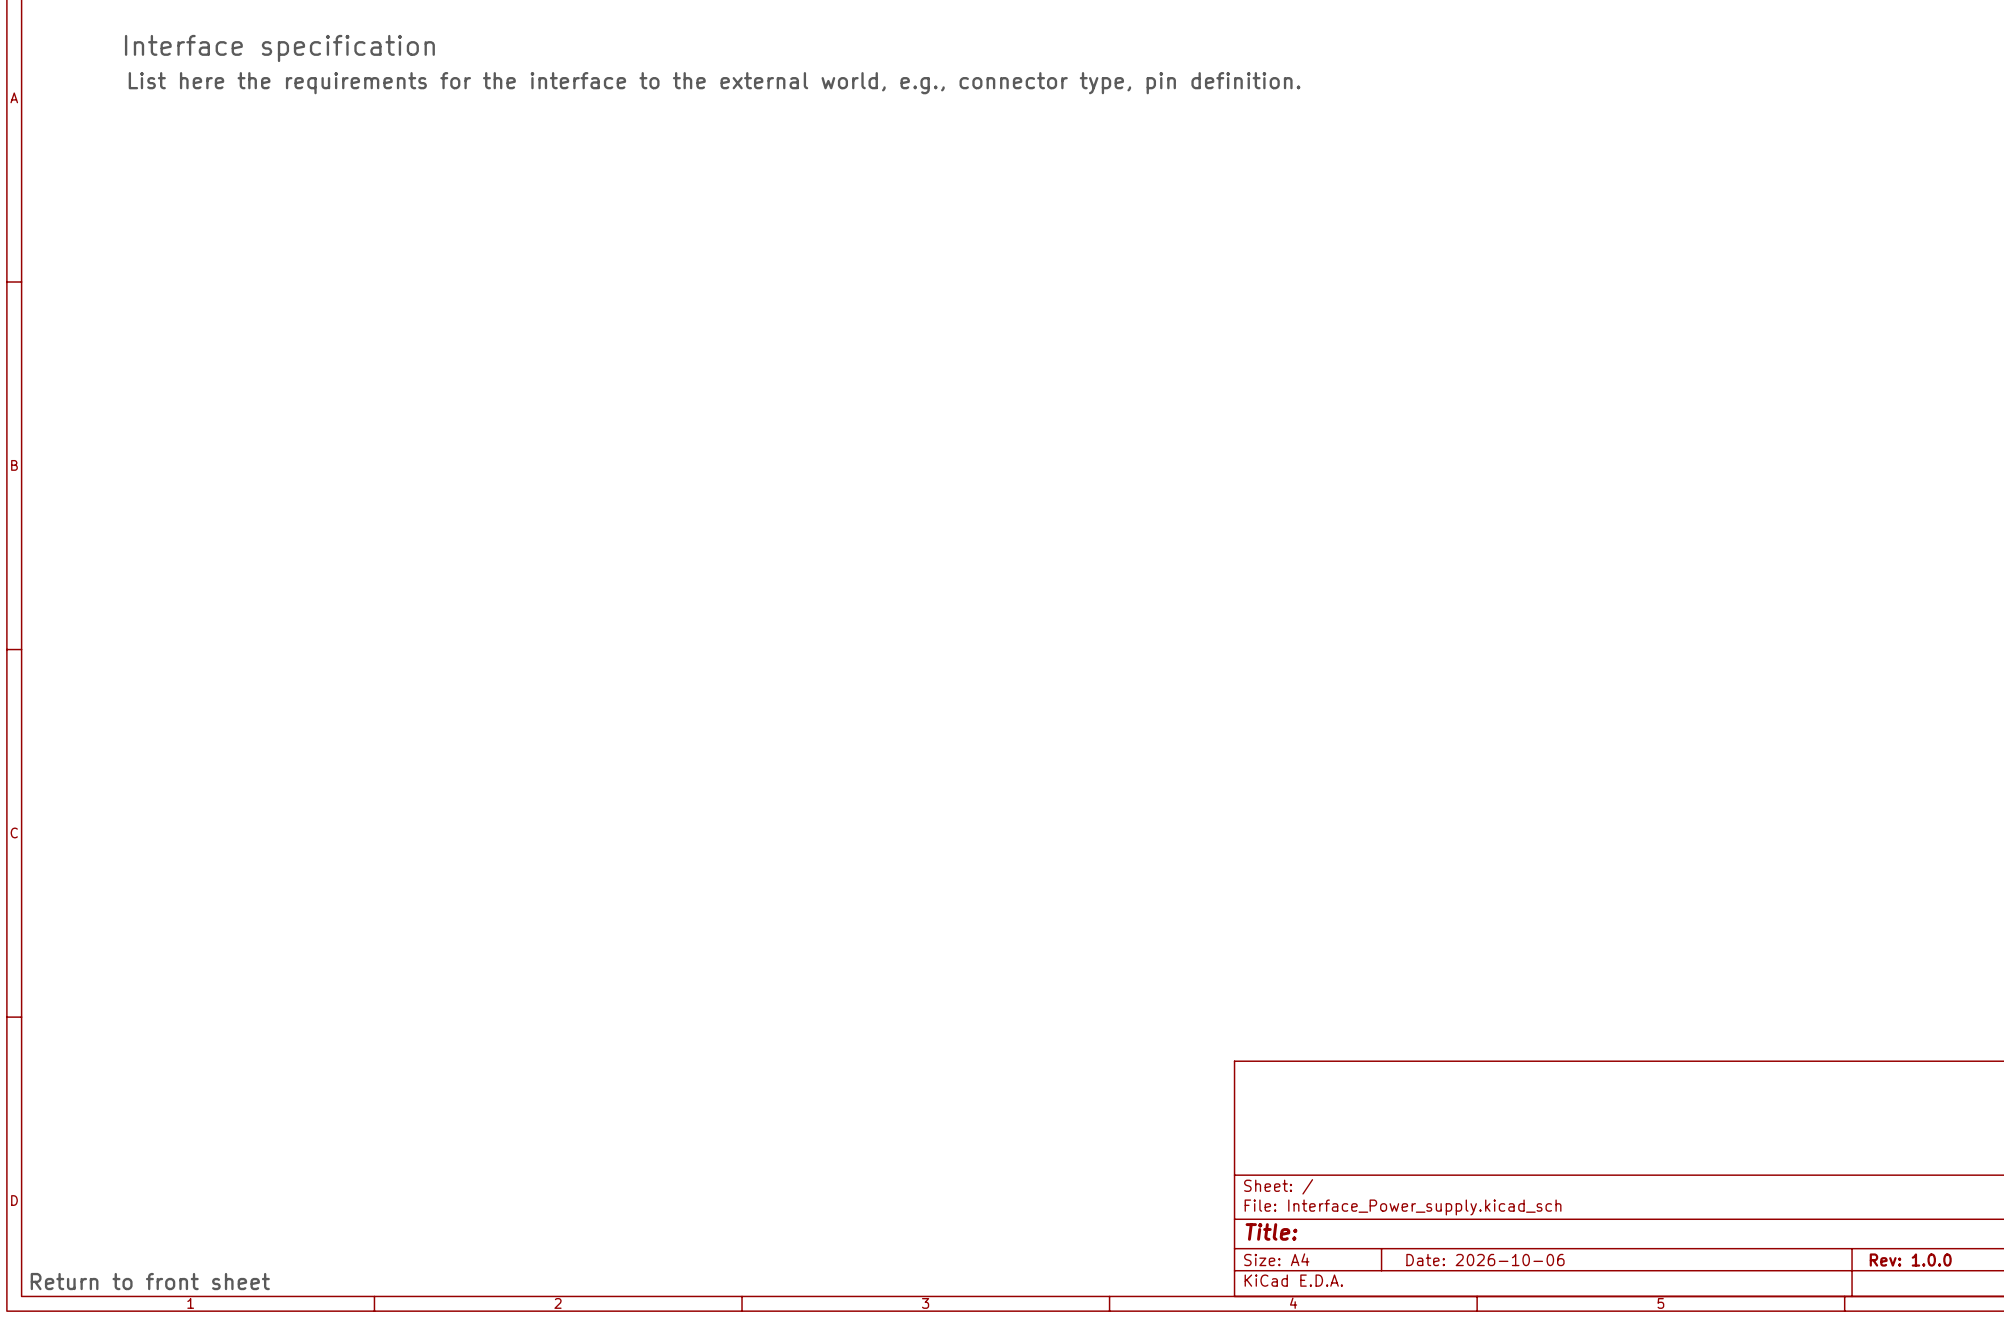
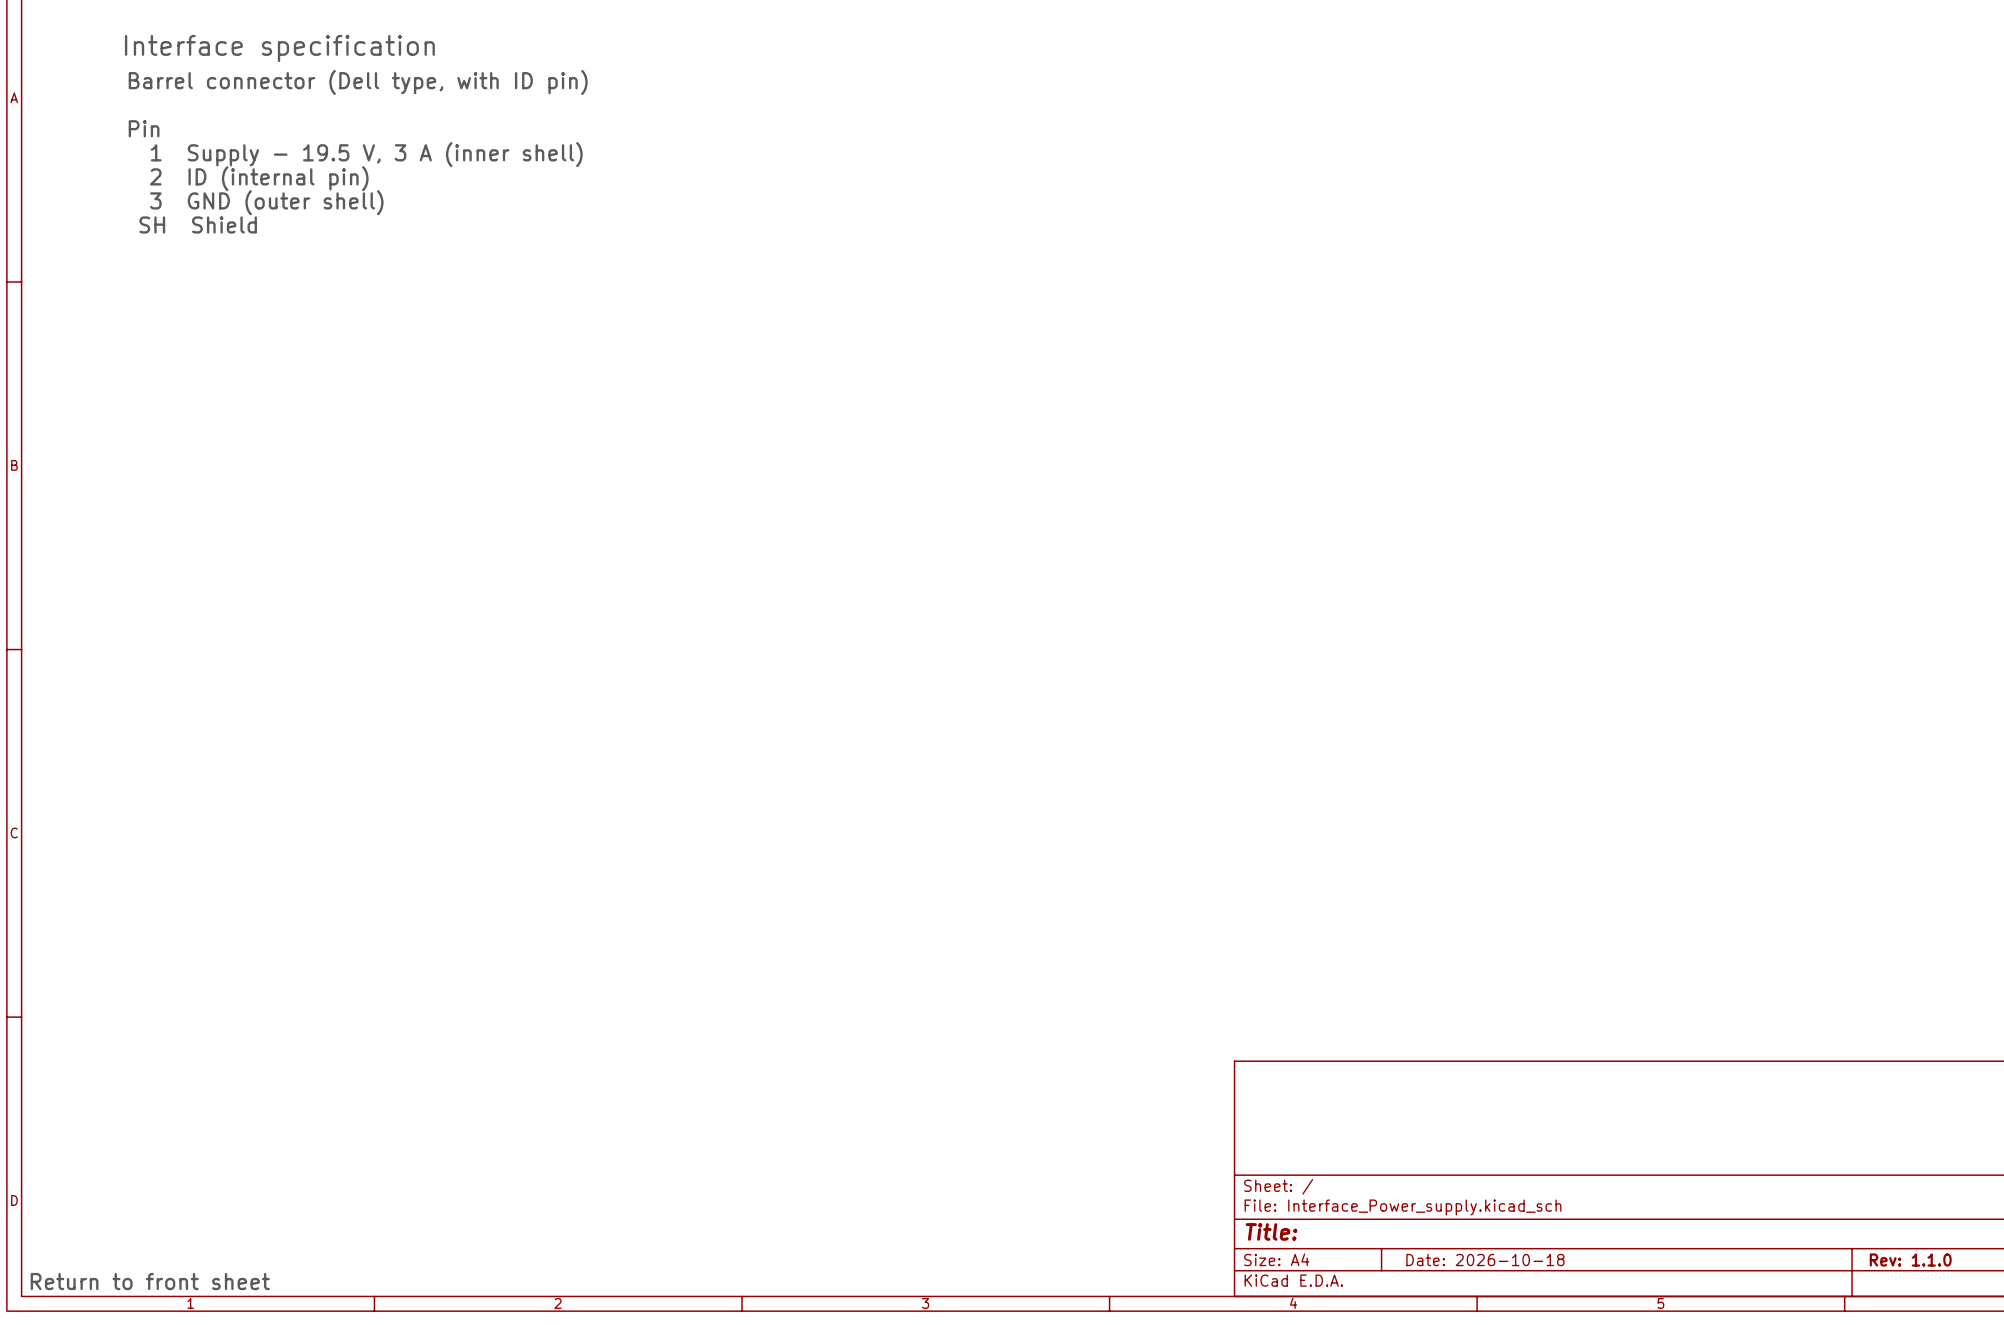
text: List here the requirements for the interface to the external world, e.g., connector type, pin definition. (714, 83) -> Barrel connector (Dell type, with ID pin) (358, 82)
text: none -> Pin (144, 128)
text: none -> 1 Supply - 19.5 V, 3 A (inner shell) (366, 154)
text: none -> 2 ID (internal pin) (259, 178)
text: none -> 3 GND (outer shell) (266, 202)
text: none -> SH Shield (198, 224)
title block: Date: 2026-10-06 (1485, 1260) -> Date: 2026-10-18 (1485, 1260)
title block: Rev: 1.0.0 (1910, 1260) -> Rev: 1.1.0 (1910, 1260)

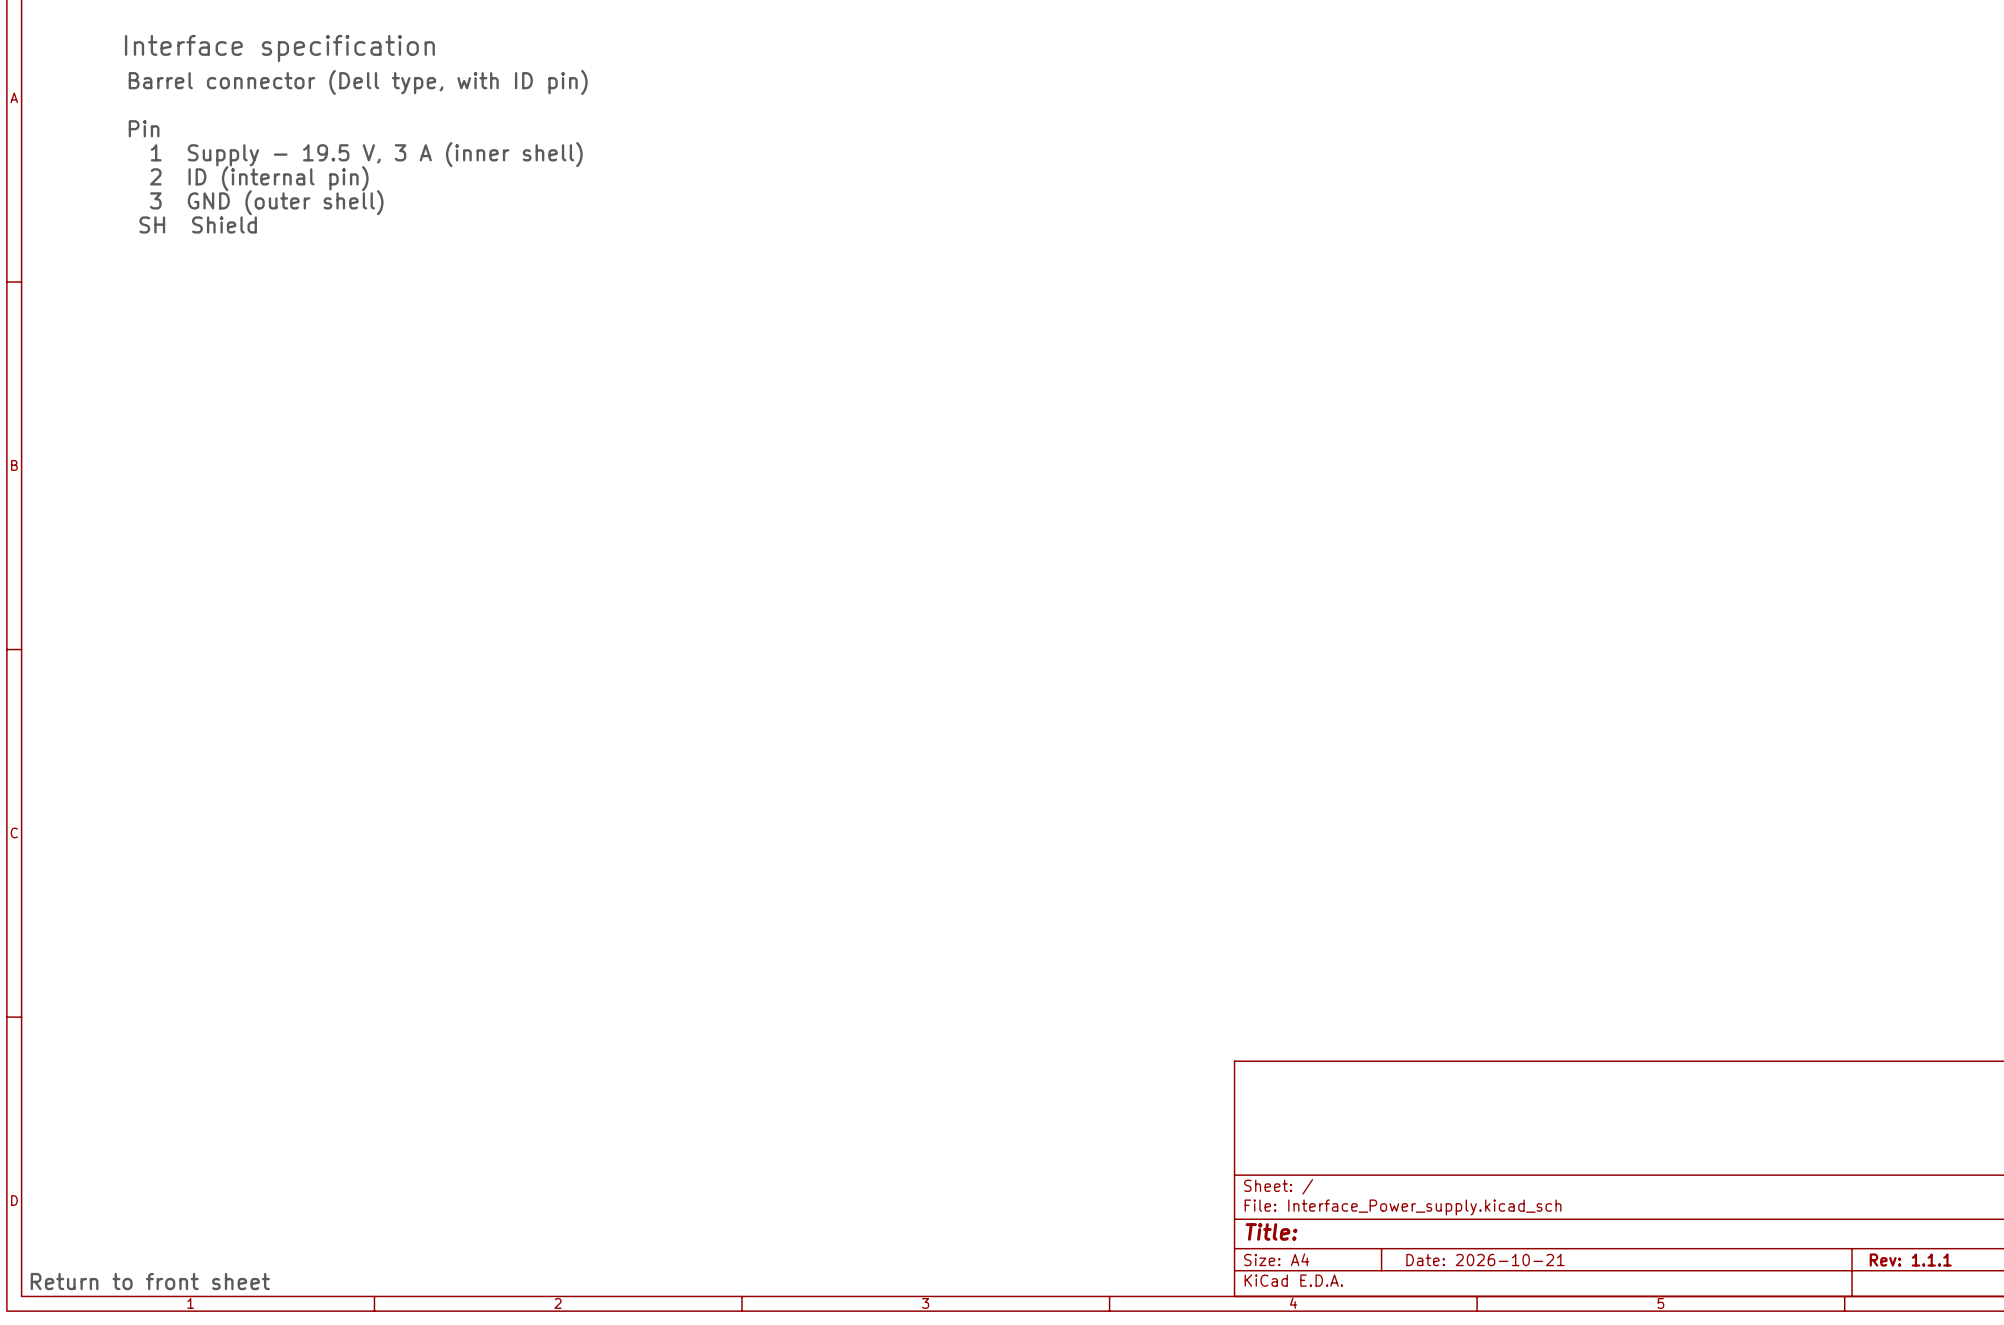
title block: Date: 2026-10-18 (1485, 1260) -> Date: 2026-10-21 (1485, 1260)
title block: Rev: 1.1.0 (1910, 1260) -> Rev: 1.1.1 (1910, 1260)

